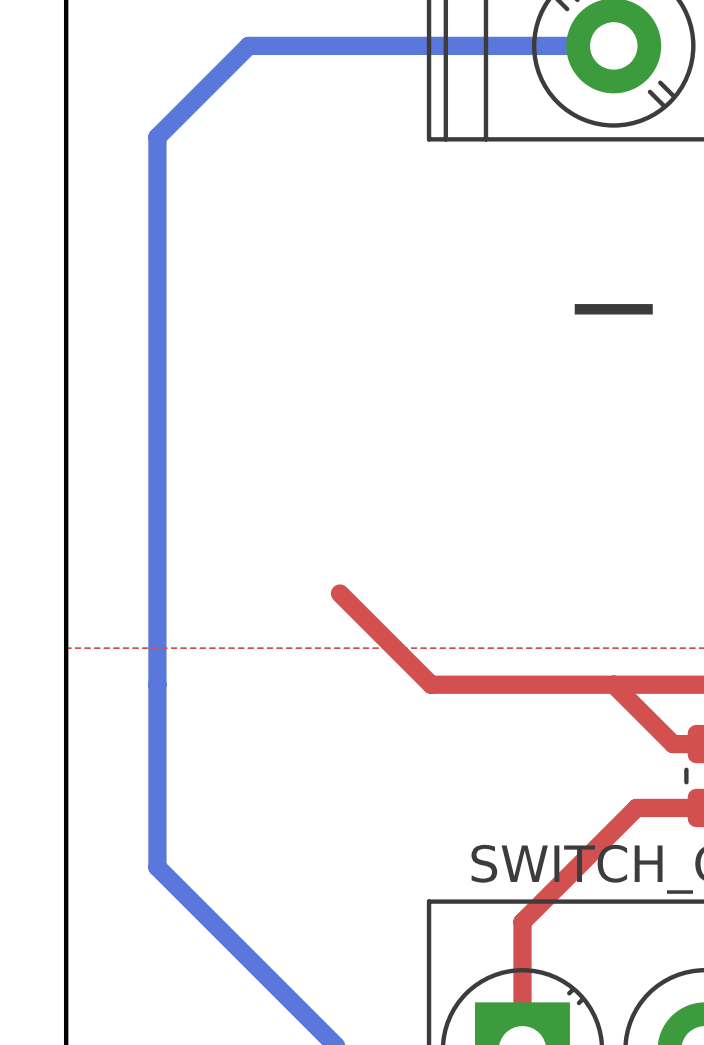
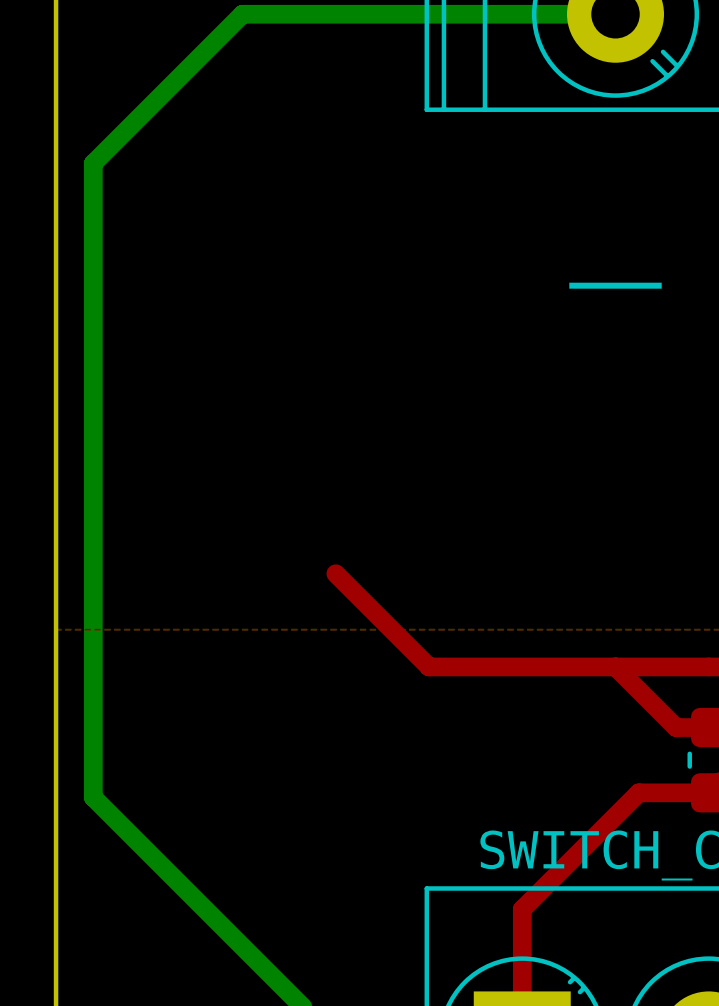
bottom track: (157, 137) (157, 867) -> (149, 107) (93, 163) (93, 797) (149, 853)

